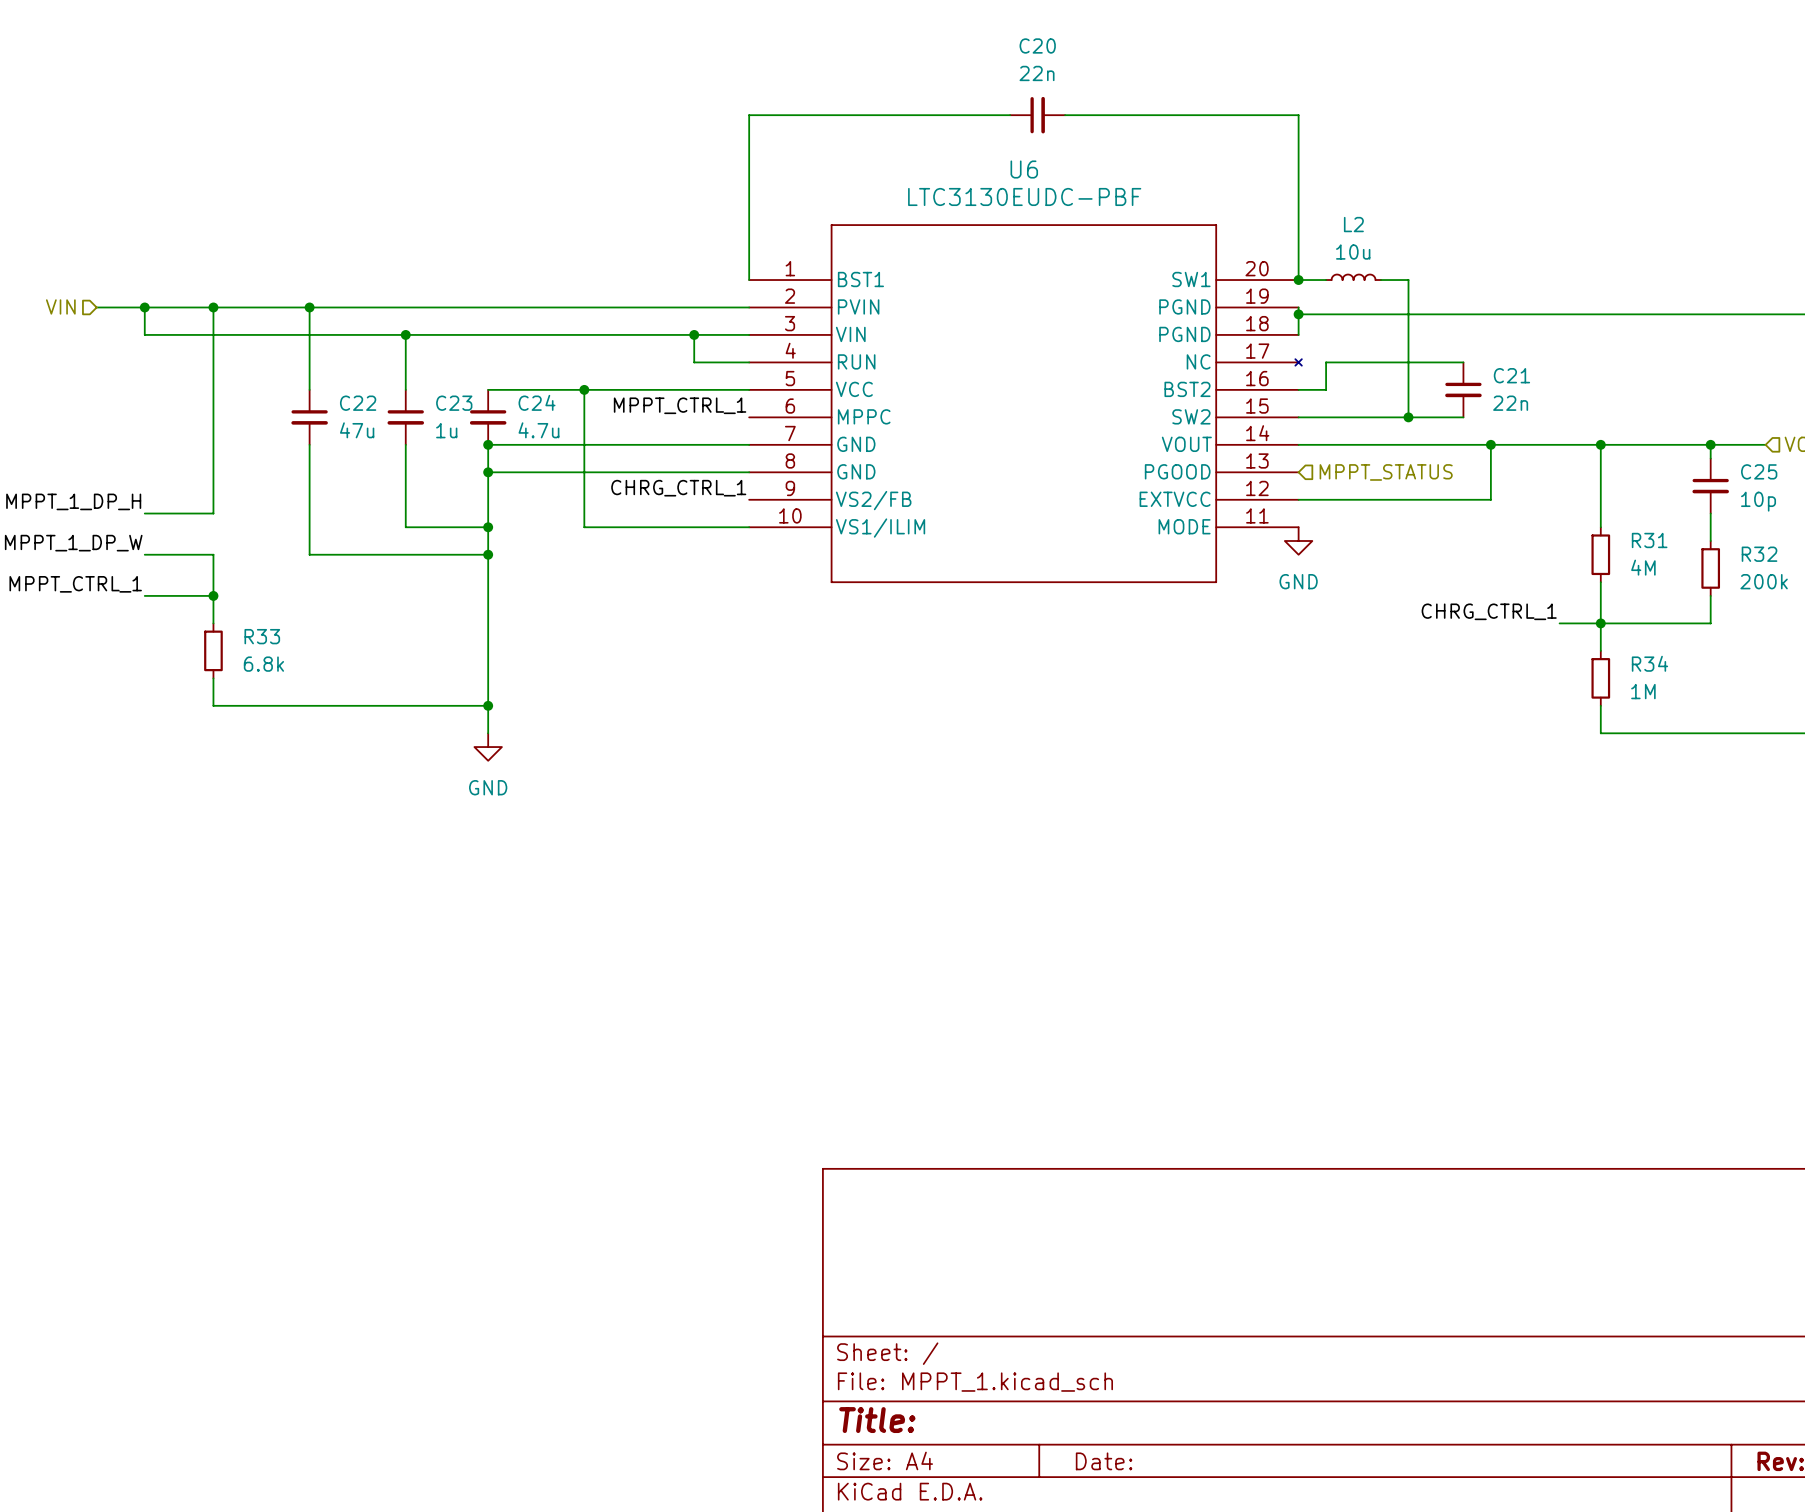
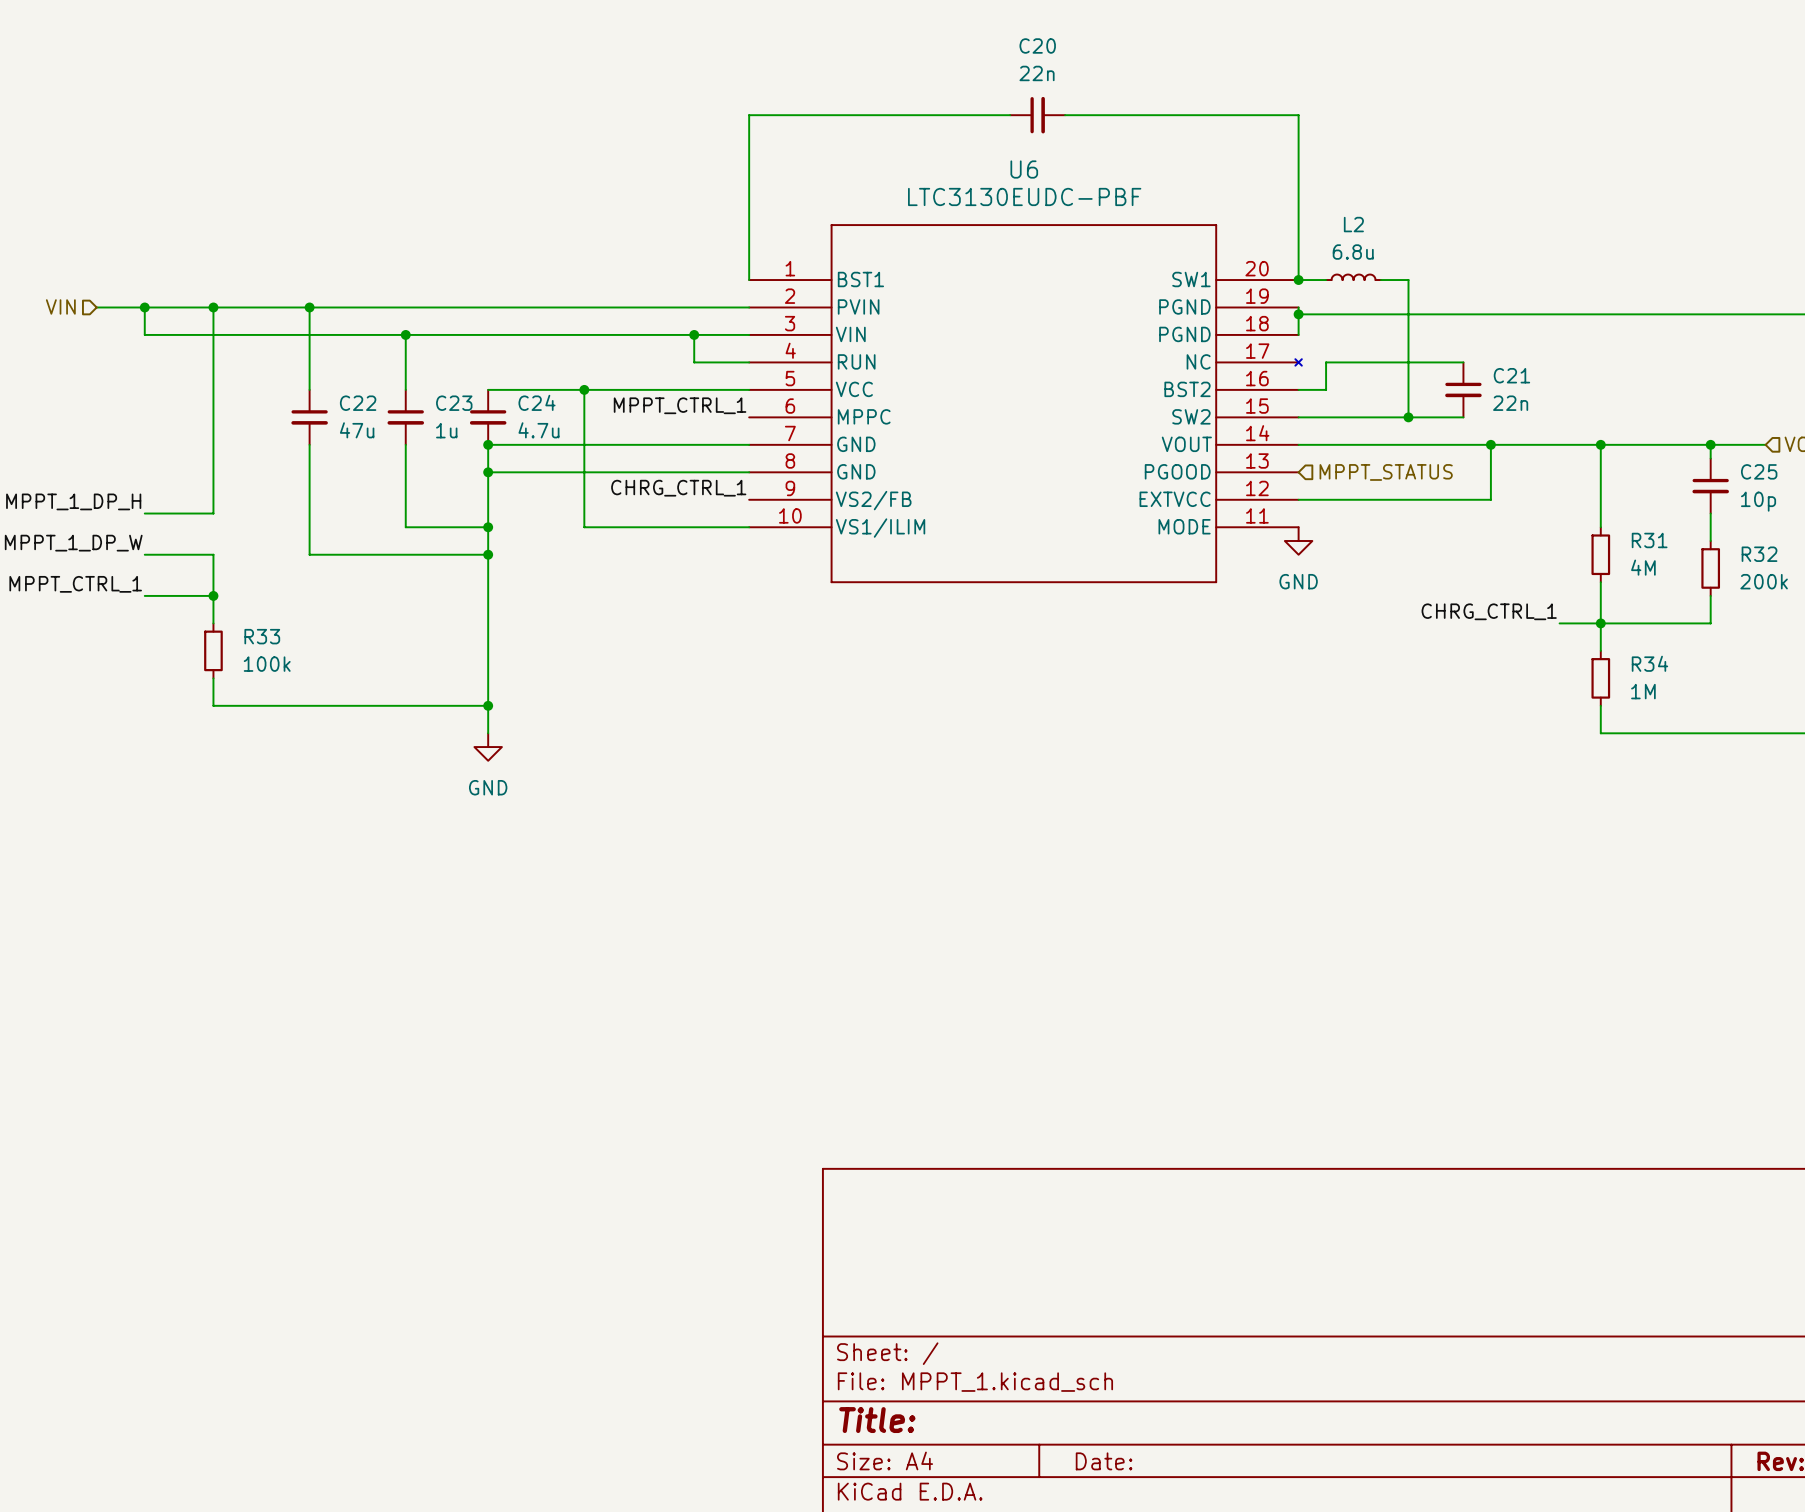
L2 value: 10u (1353, 252) -> 6.8u (1353, 252)
R33 value: 6.8k (263, 664) -> 100k (267, 664)

